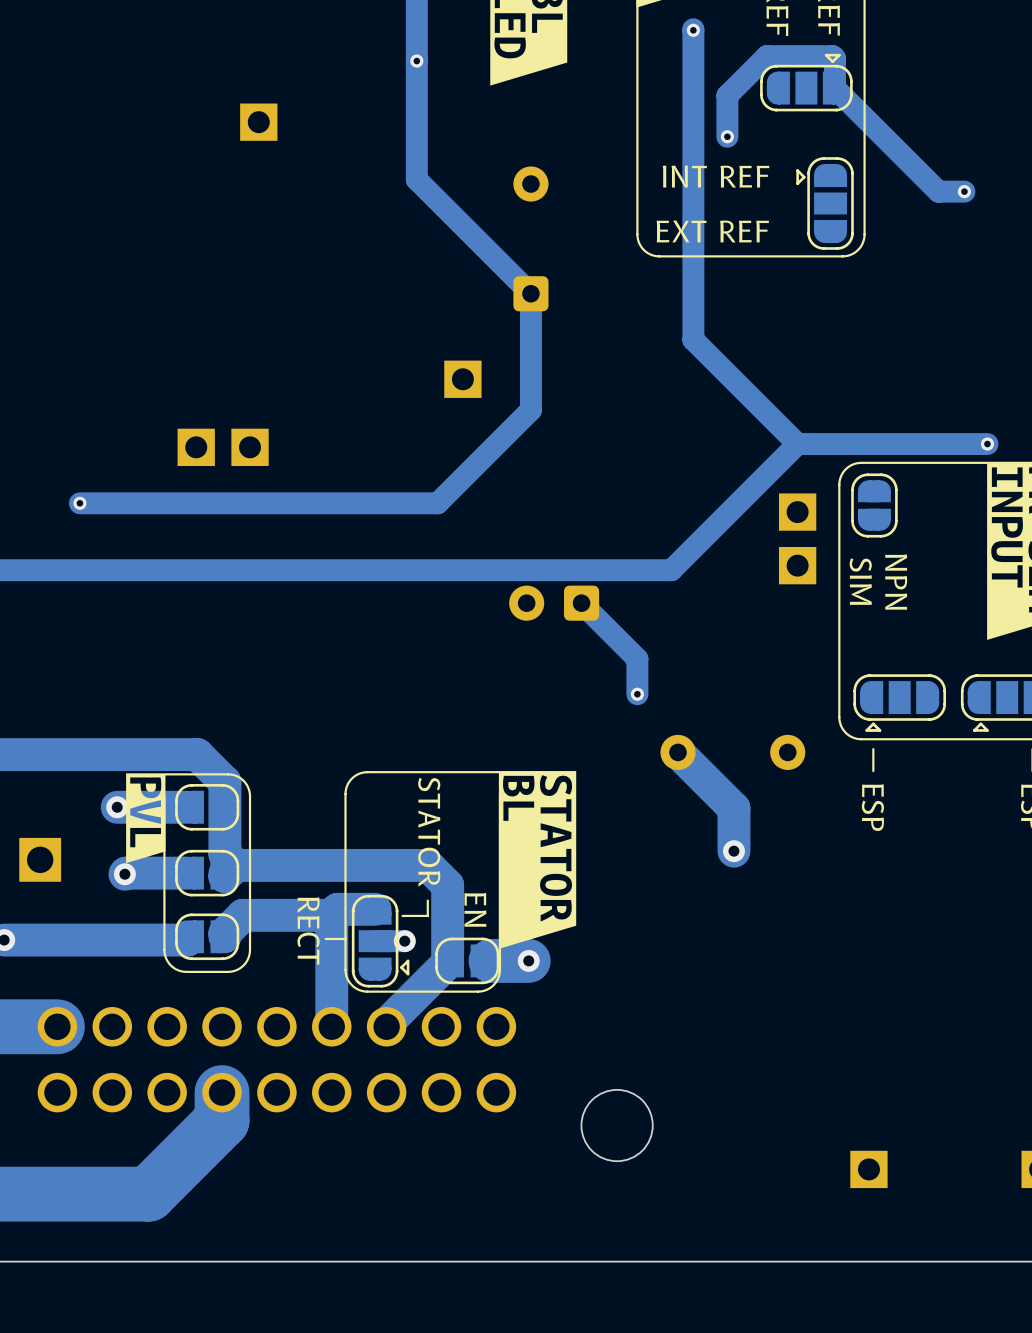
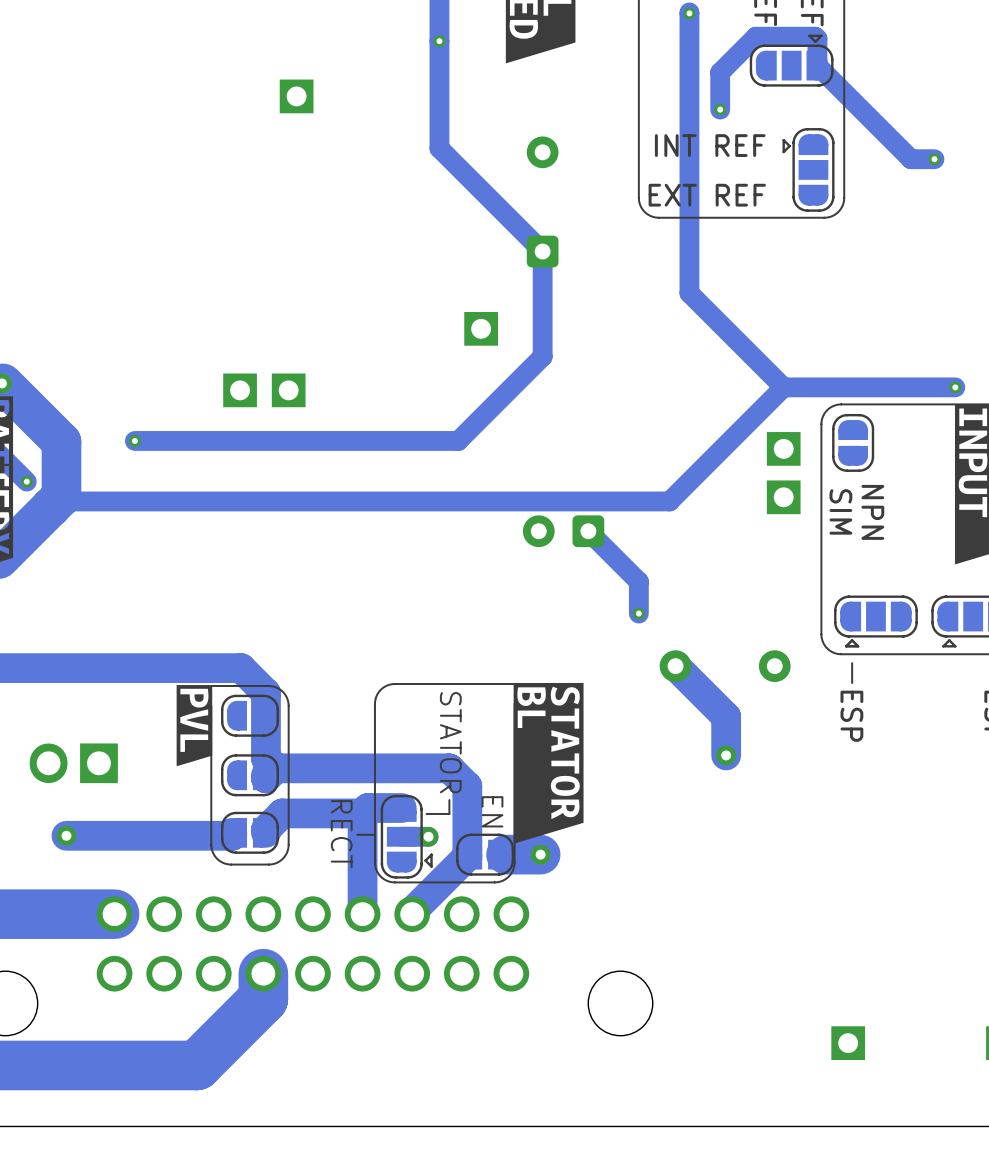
via: (117, 807) -> none
track: (187, 807) (117, 807) -> none
track: (187, 873) (124, 874) -> none
via: (124, 874) -> none

